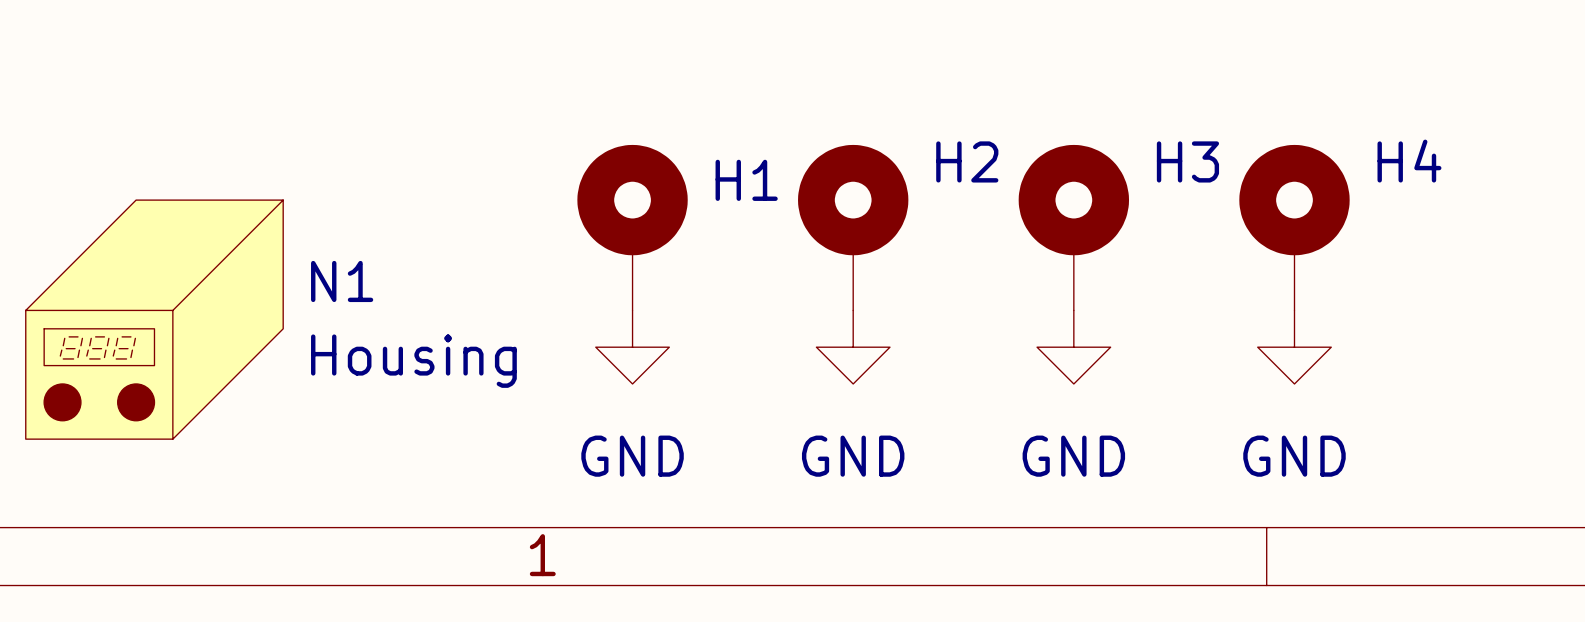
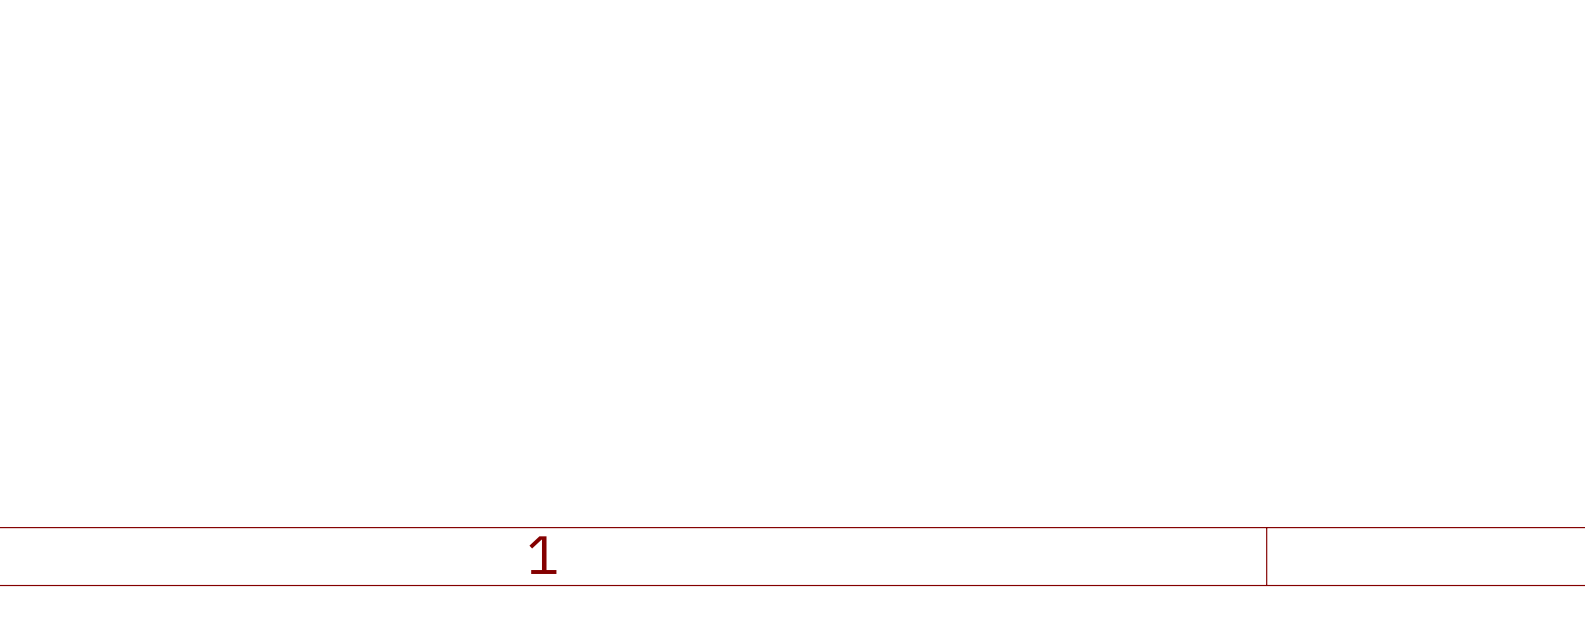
H1: (632, 227) -> none
H2: (853, 227) -> none
H3: (1073, 227) -> none
H4: (1294, 227) -> none
N1: Housing (154, 319) -> none
power symbol: GND (632, 347) -> none
power symbol: GND (853, 347) -> none
power symbol: GND (1073, 347) -> none
power symbol: GND (1294, 347) -> none

